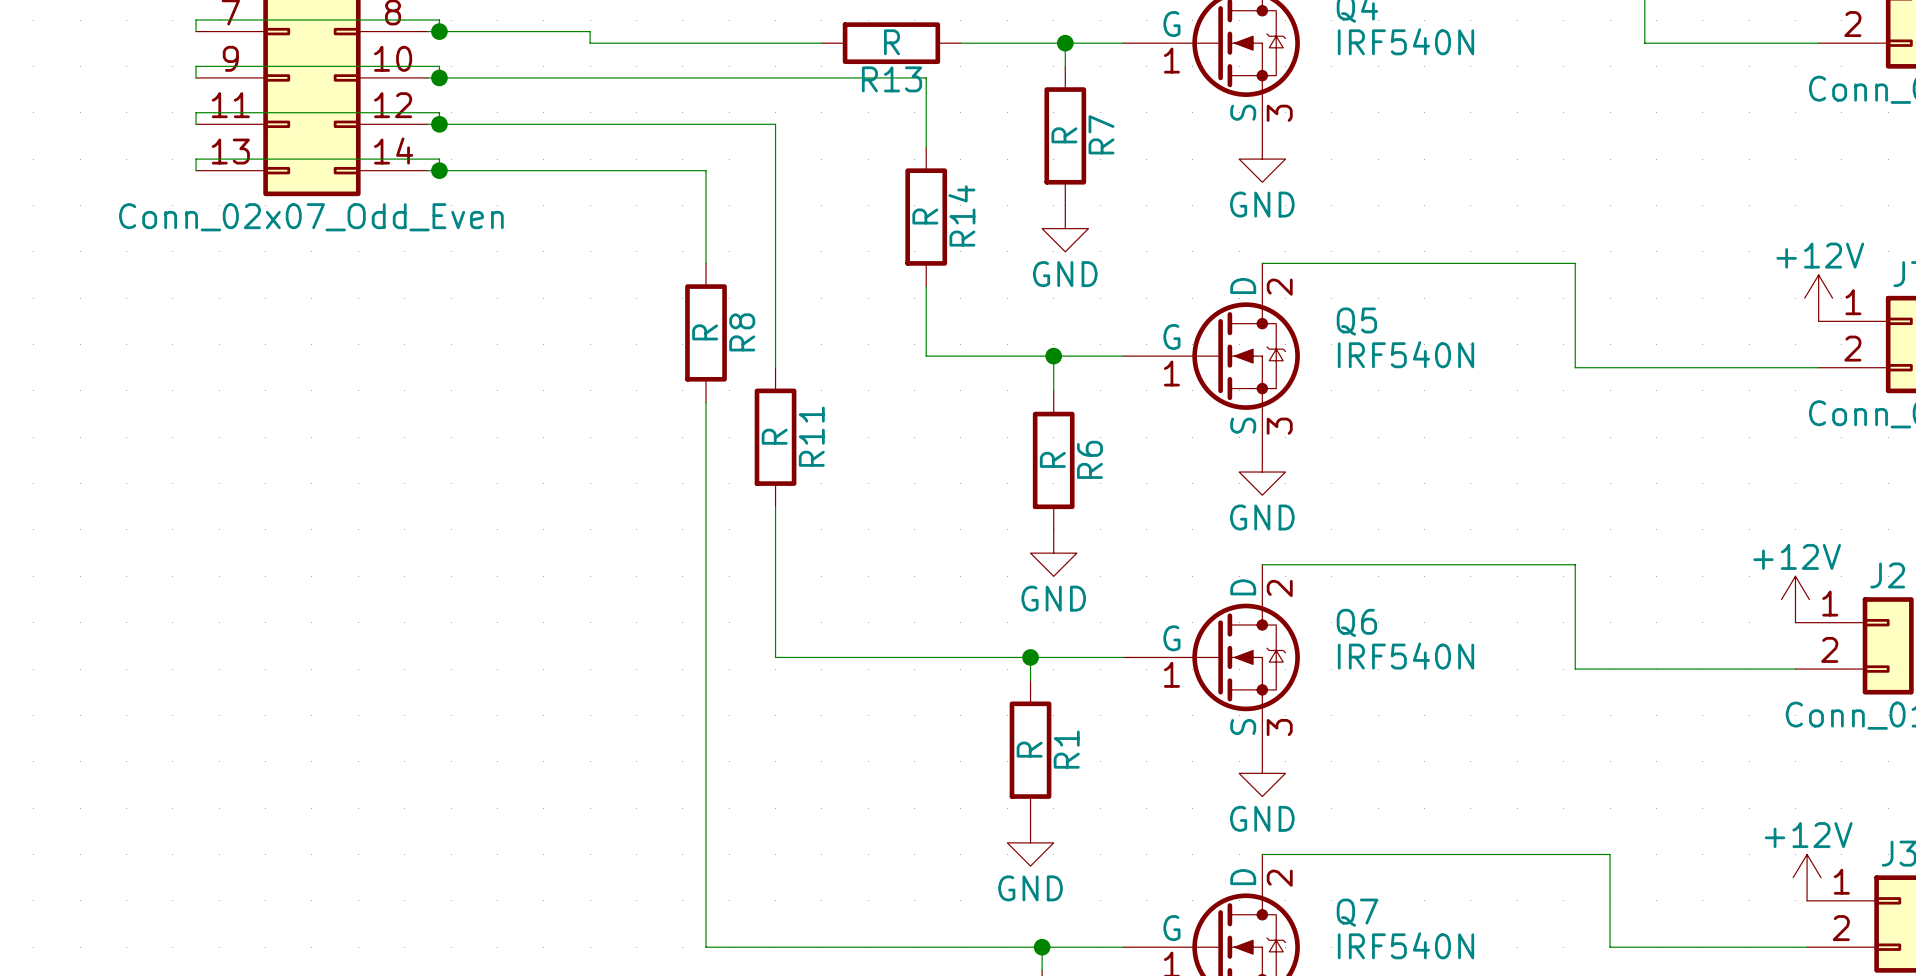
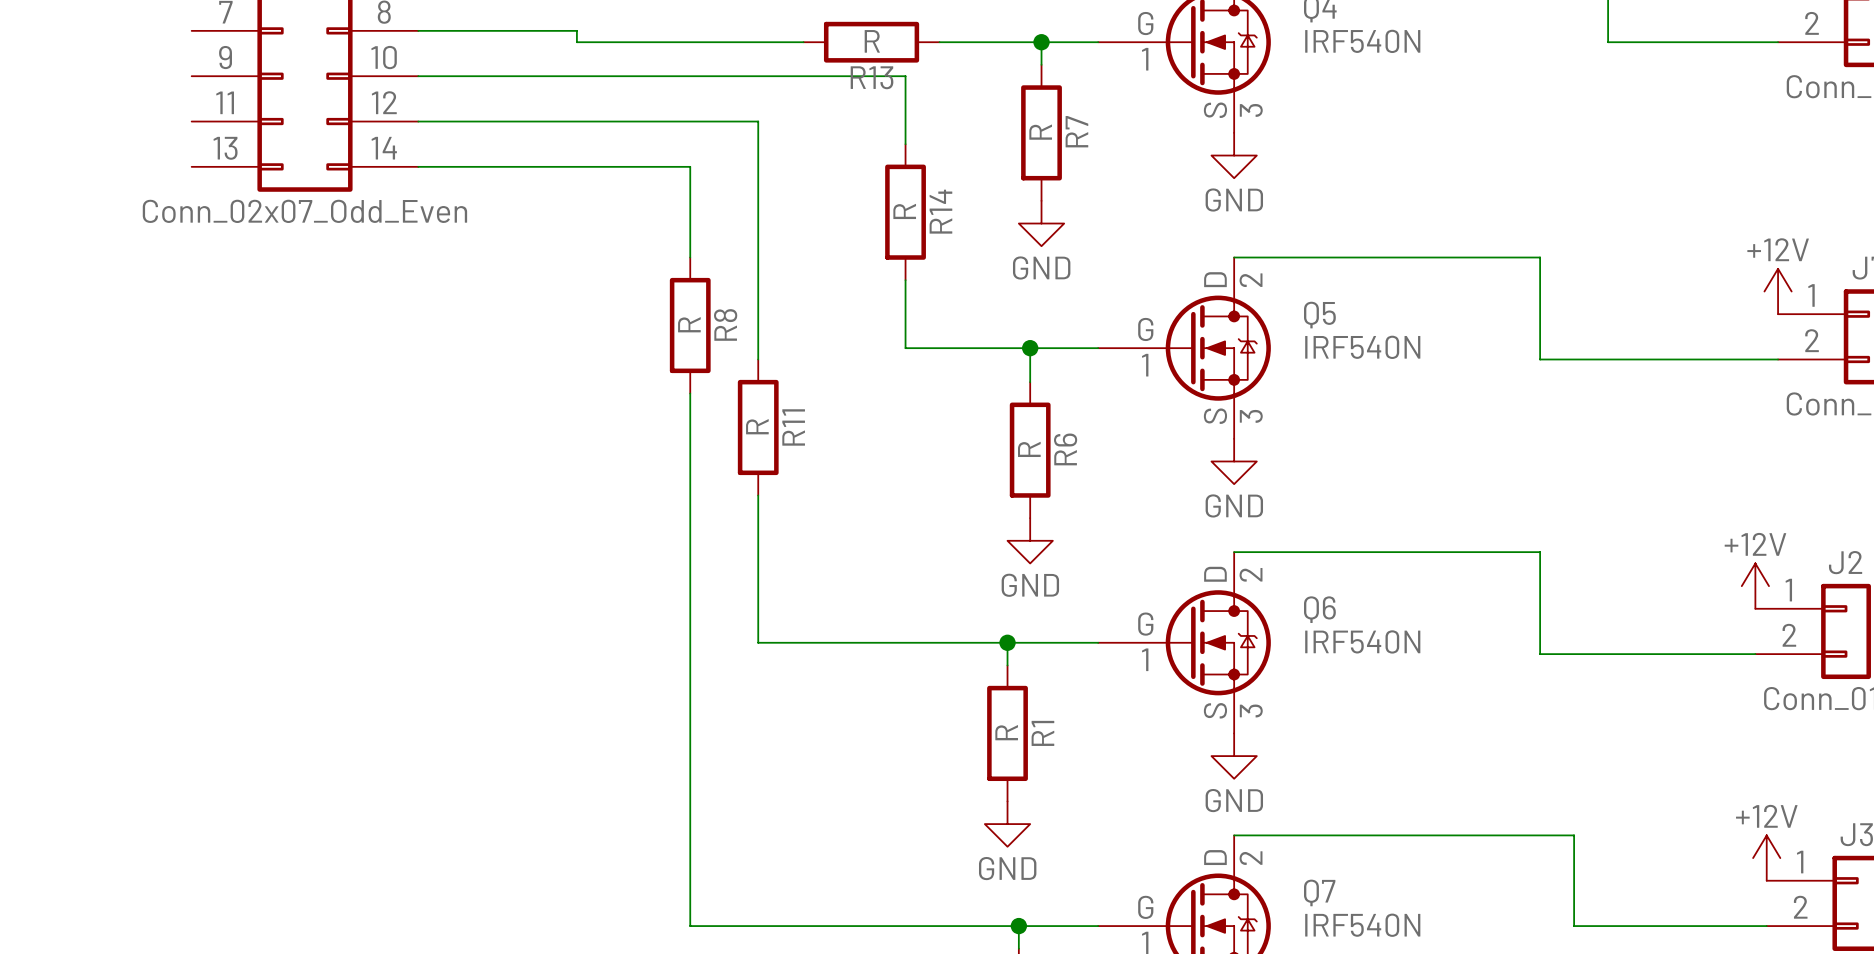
wire: (196, 31) (196, 20) (439, 20) (439, 31) -> none
junction: (439, 31) -> none
wire: (196, 77) (196, 66) (439, 66) (439, 77) -> none
junction: (439, 77) -> none
wire: (196, 124) (196, 112) (439, 112) (439, 124) -> none
junction: (439, 124) -> none
wire: (196, 170) (196, 159) (439, 159) (439, 170) -> none
junction: (439, 170) -> none

